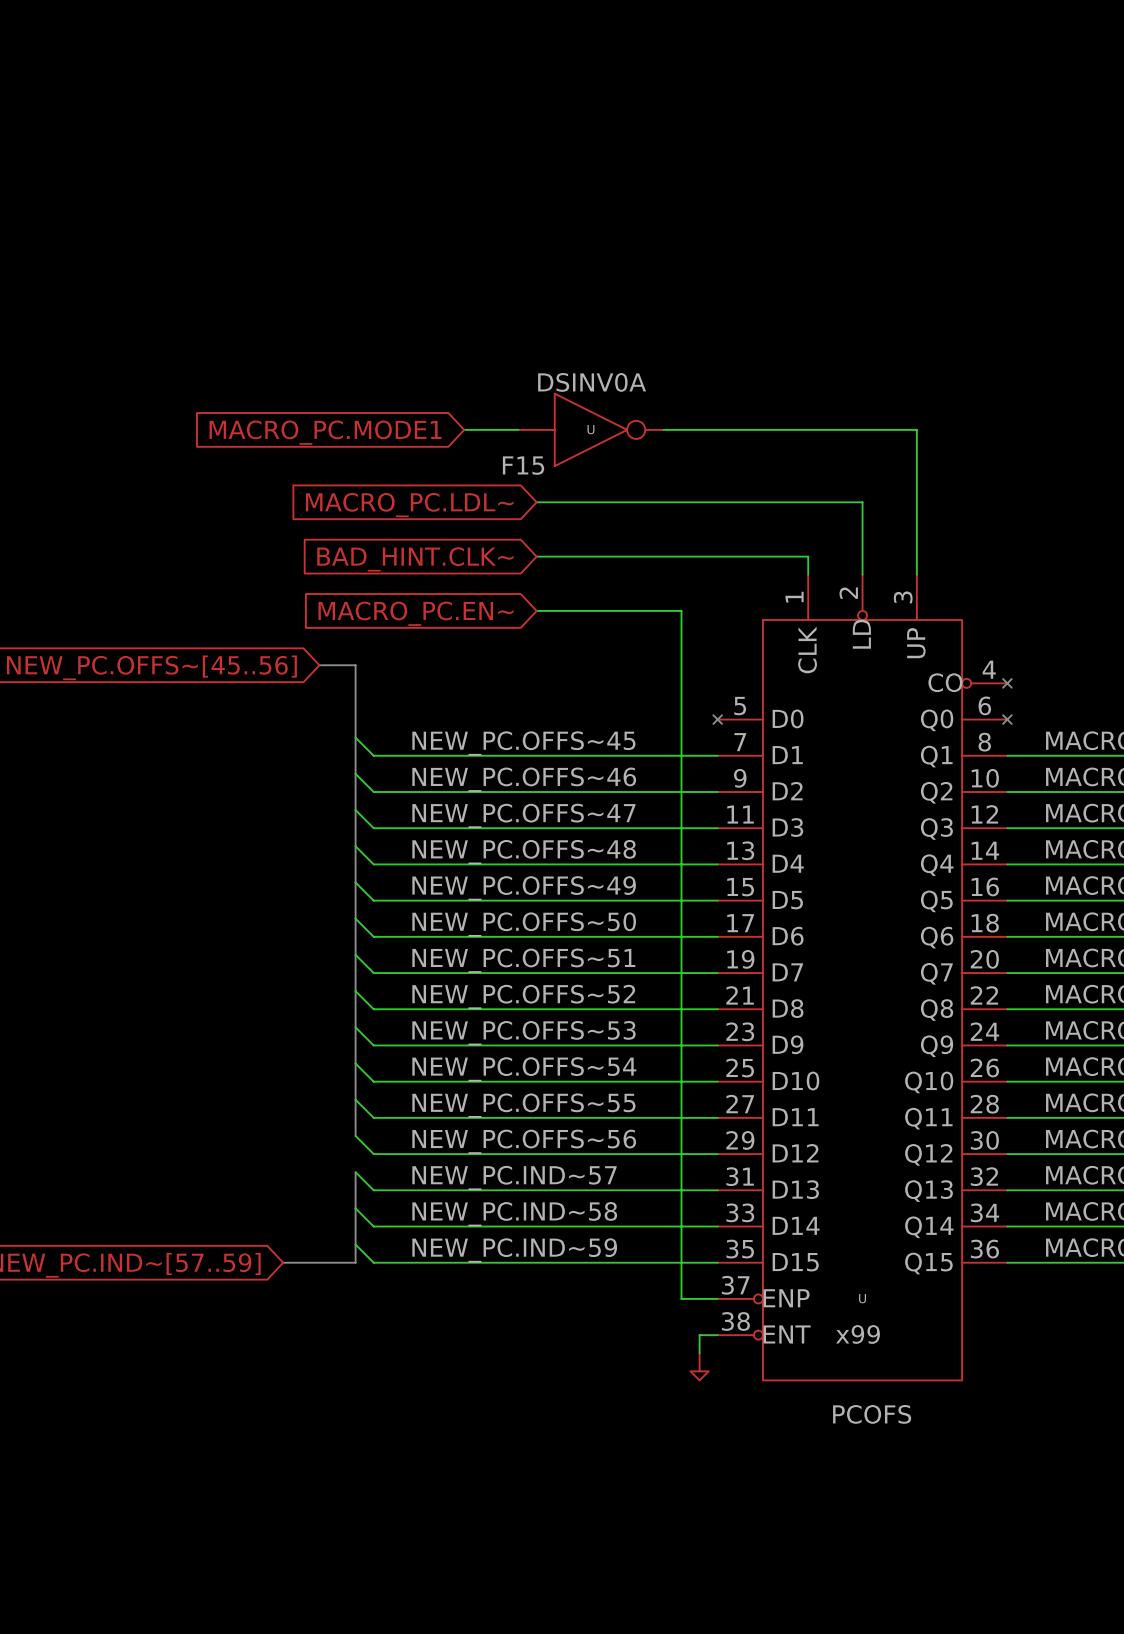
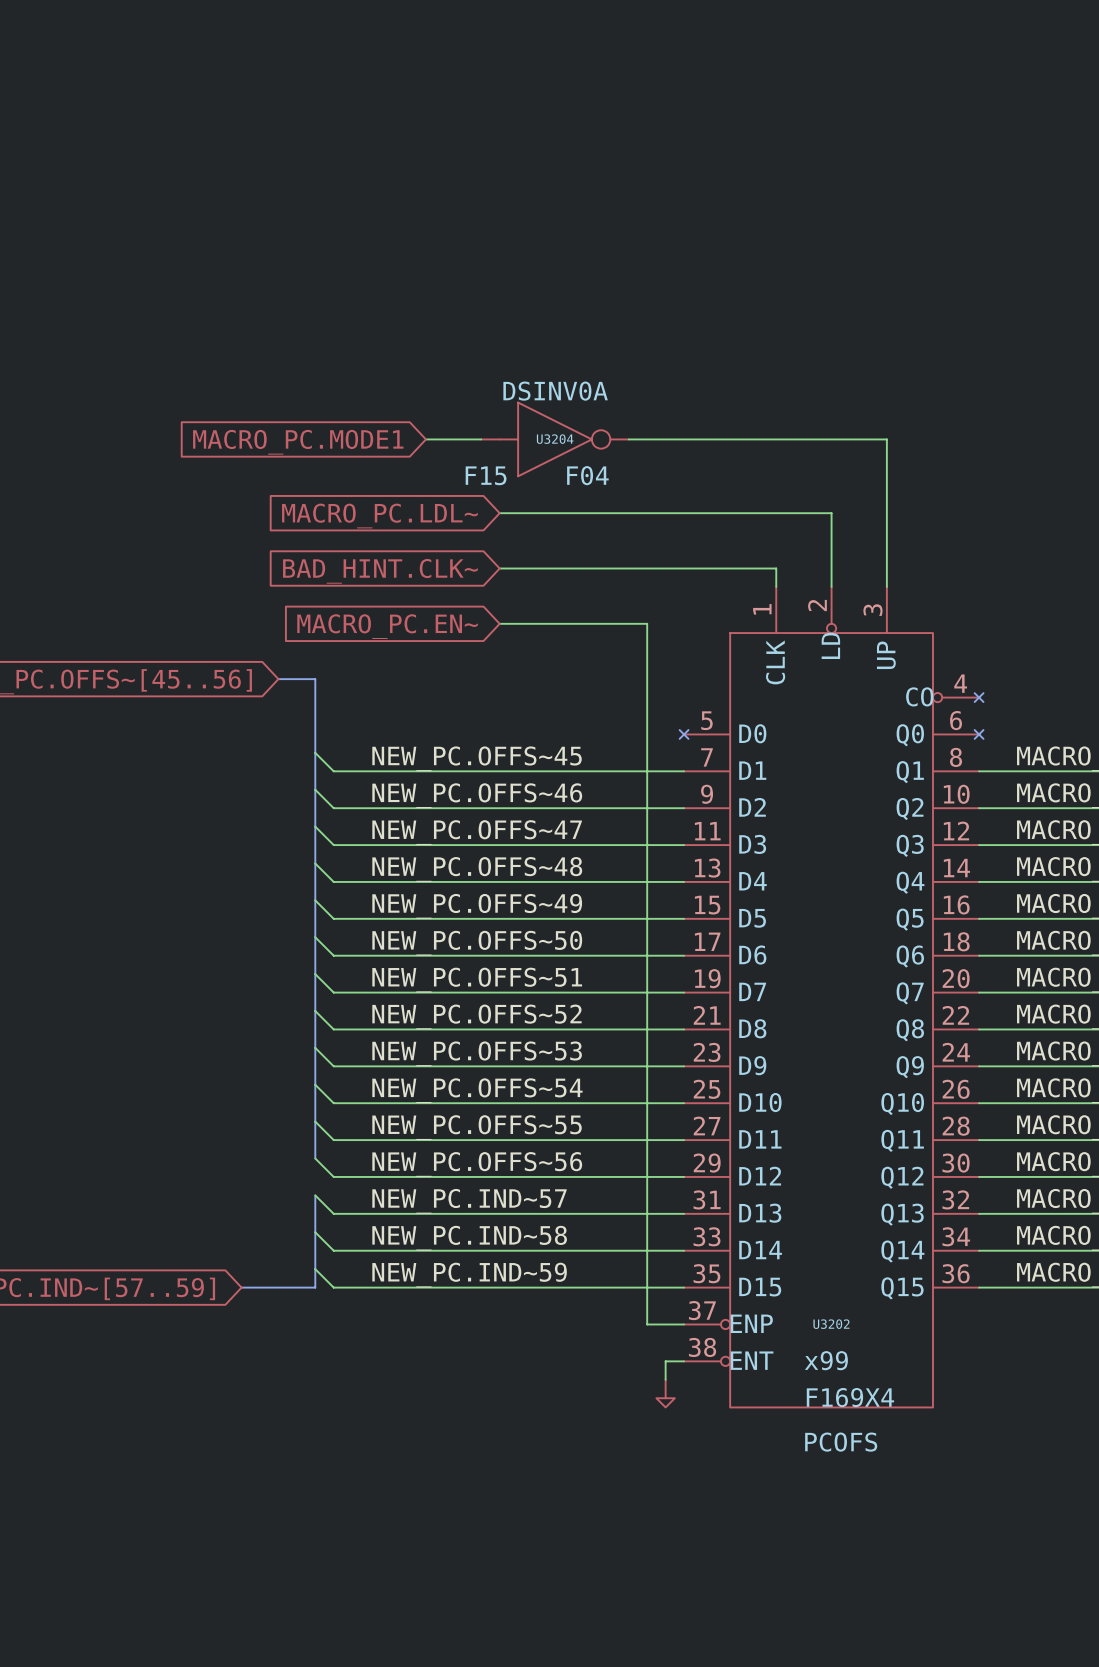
U name: U (590, 429) -> U3204 (555, 439)
U value: none -> F04 (587, 475)
U name: U (862, 1298) -> U3202 (831, 1324)
U value: none -> F169X4 (850, 1397)

